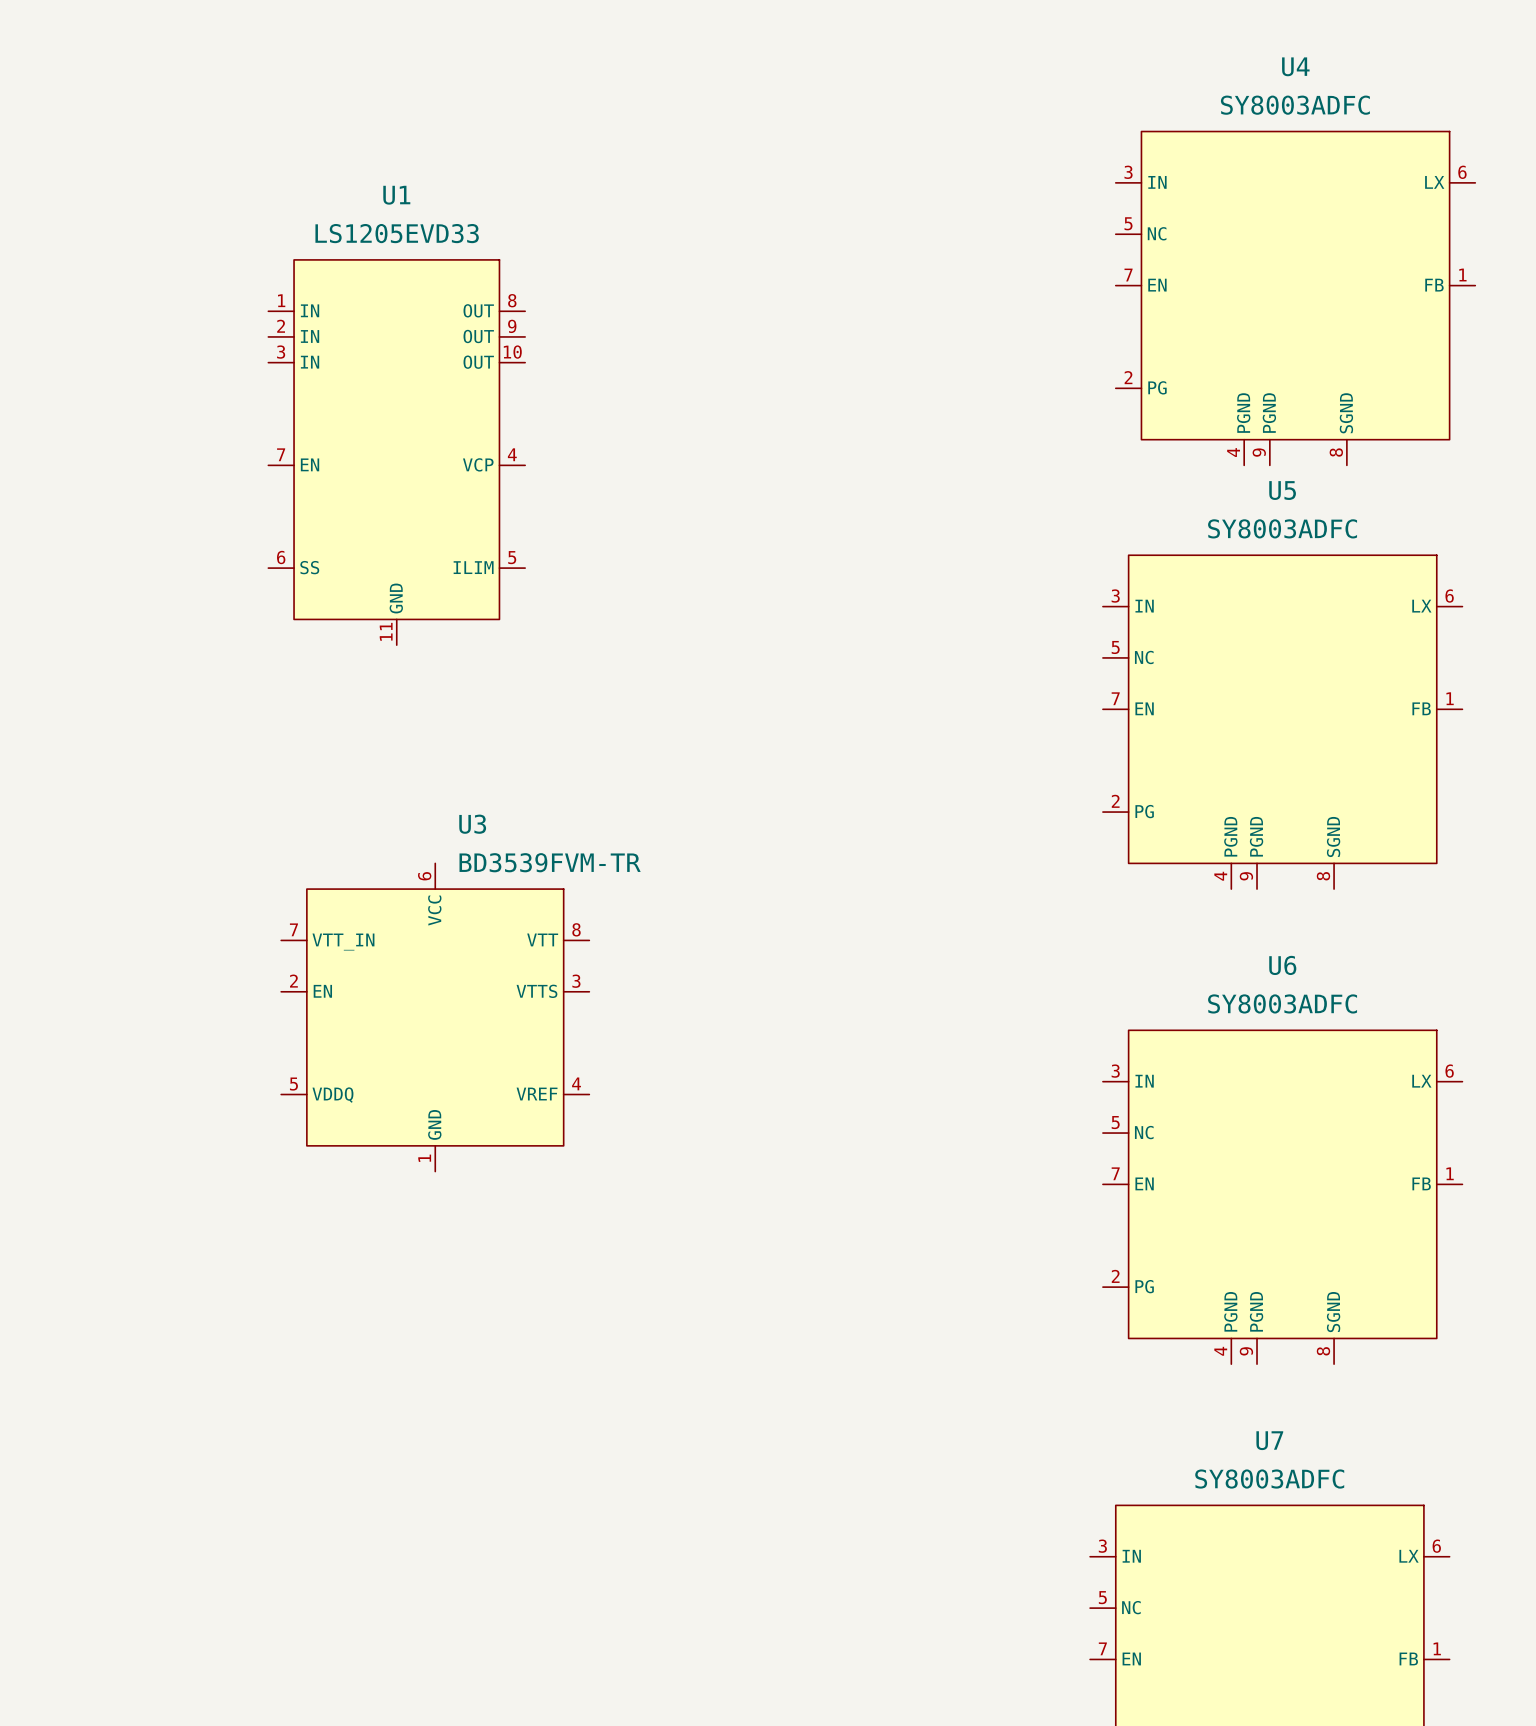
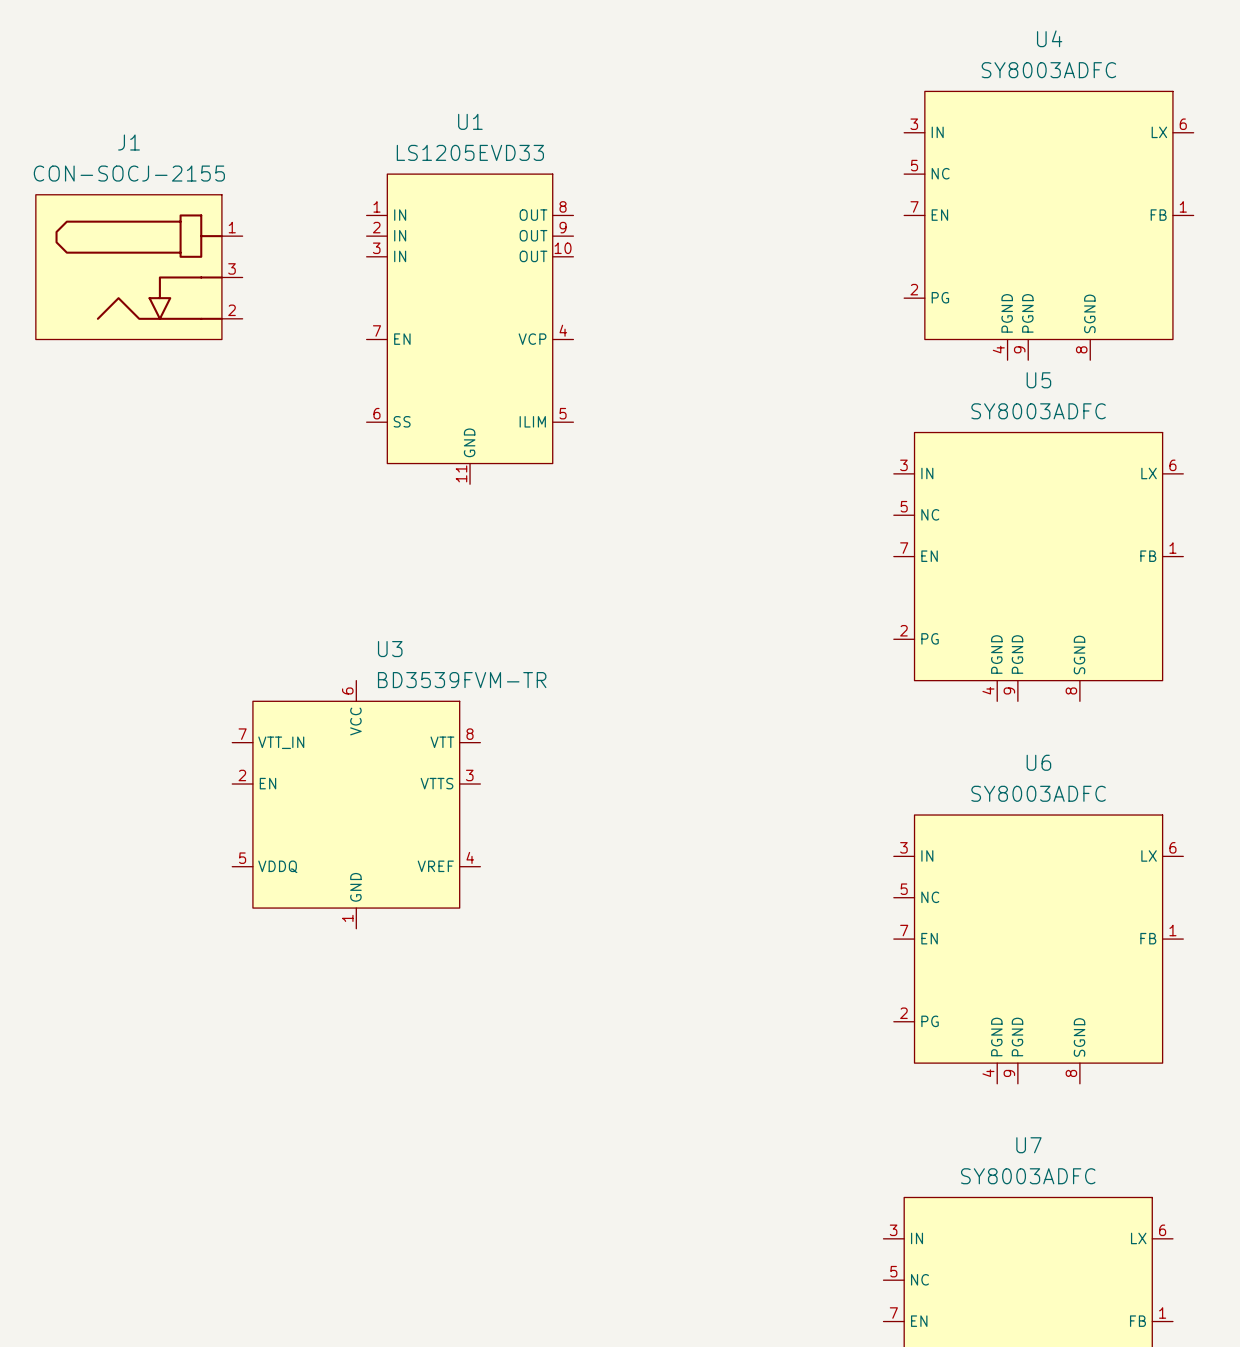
J1: none -> CON-SOCJ-2155 (139, 267)
U1 position: (396, 452) -> (470, 329)

